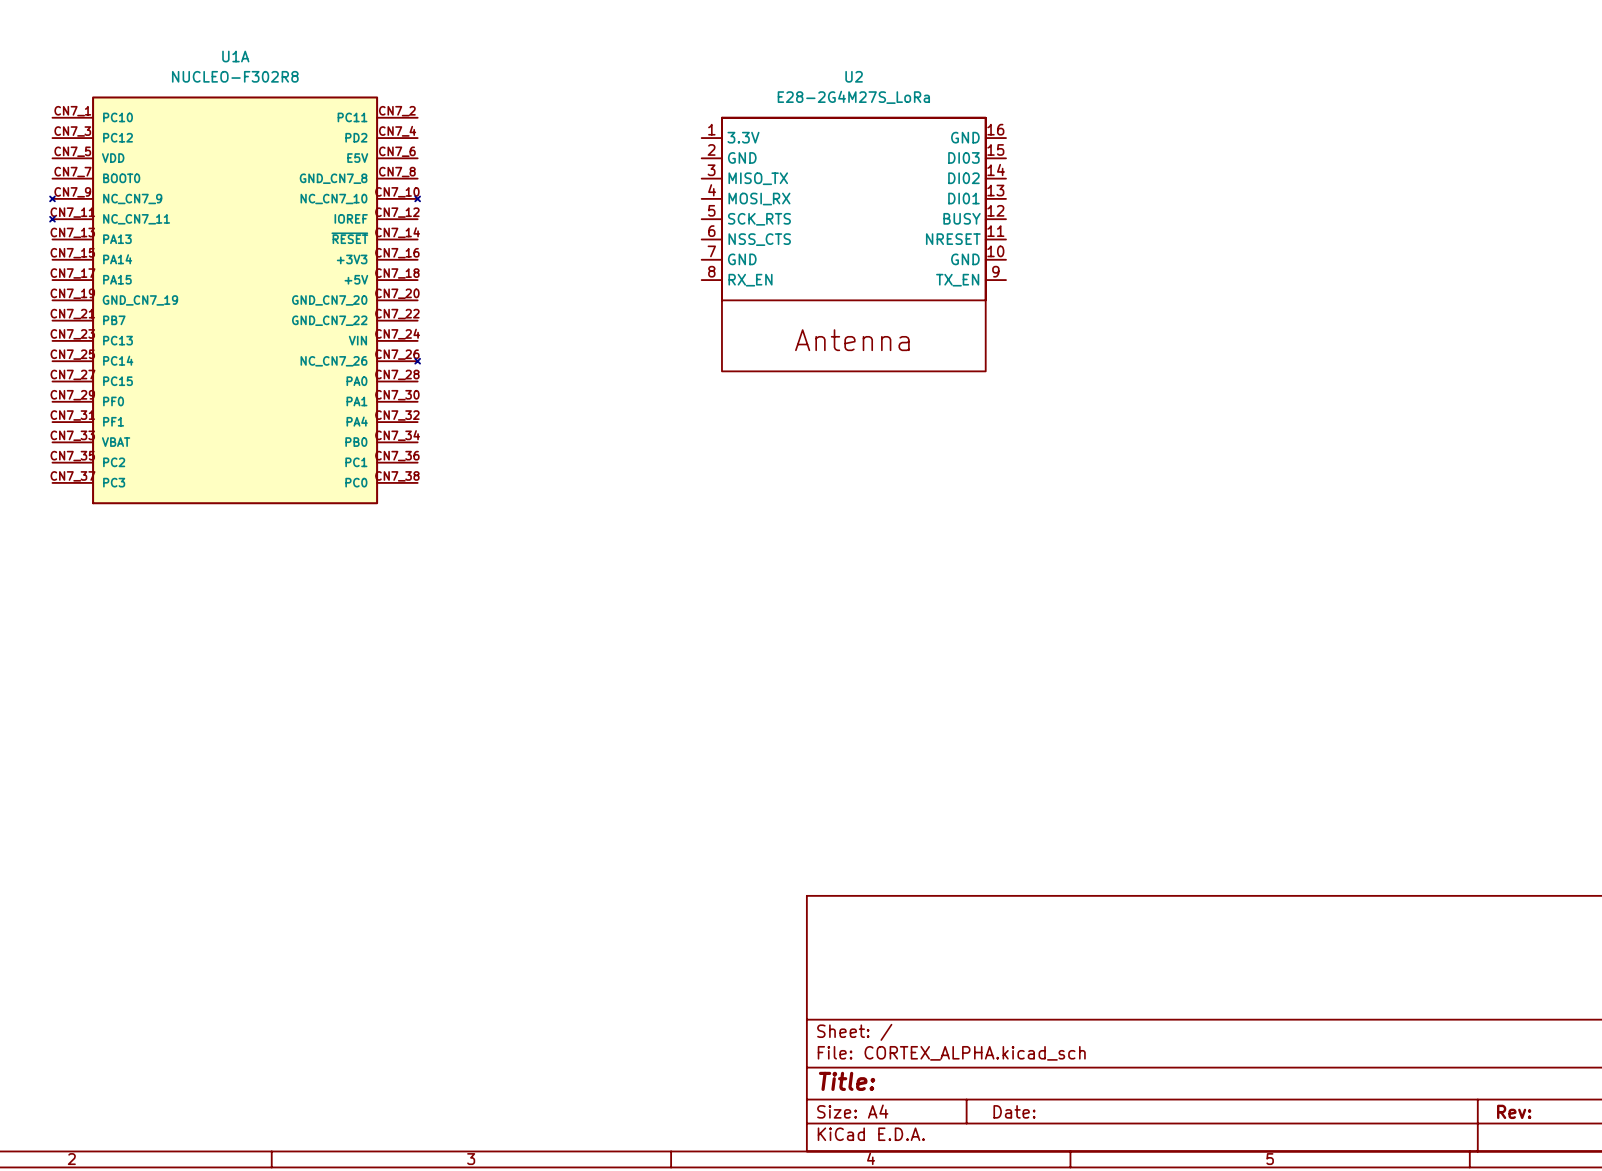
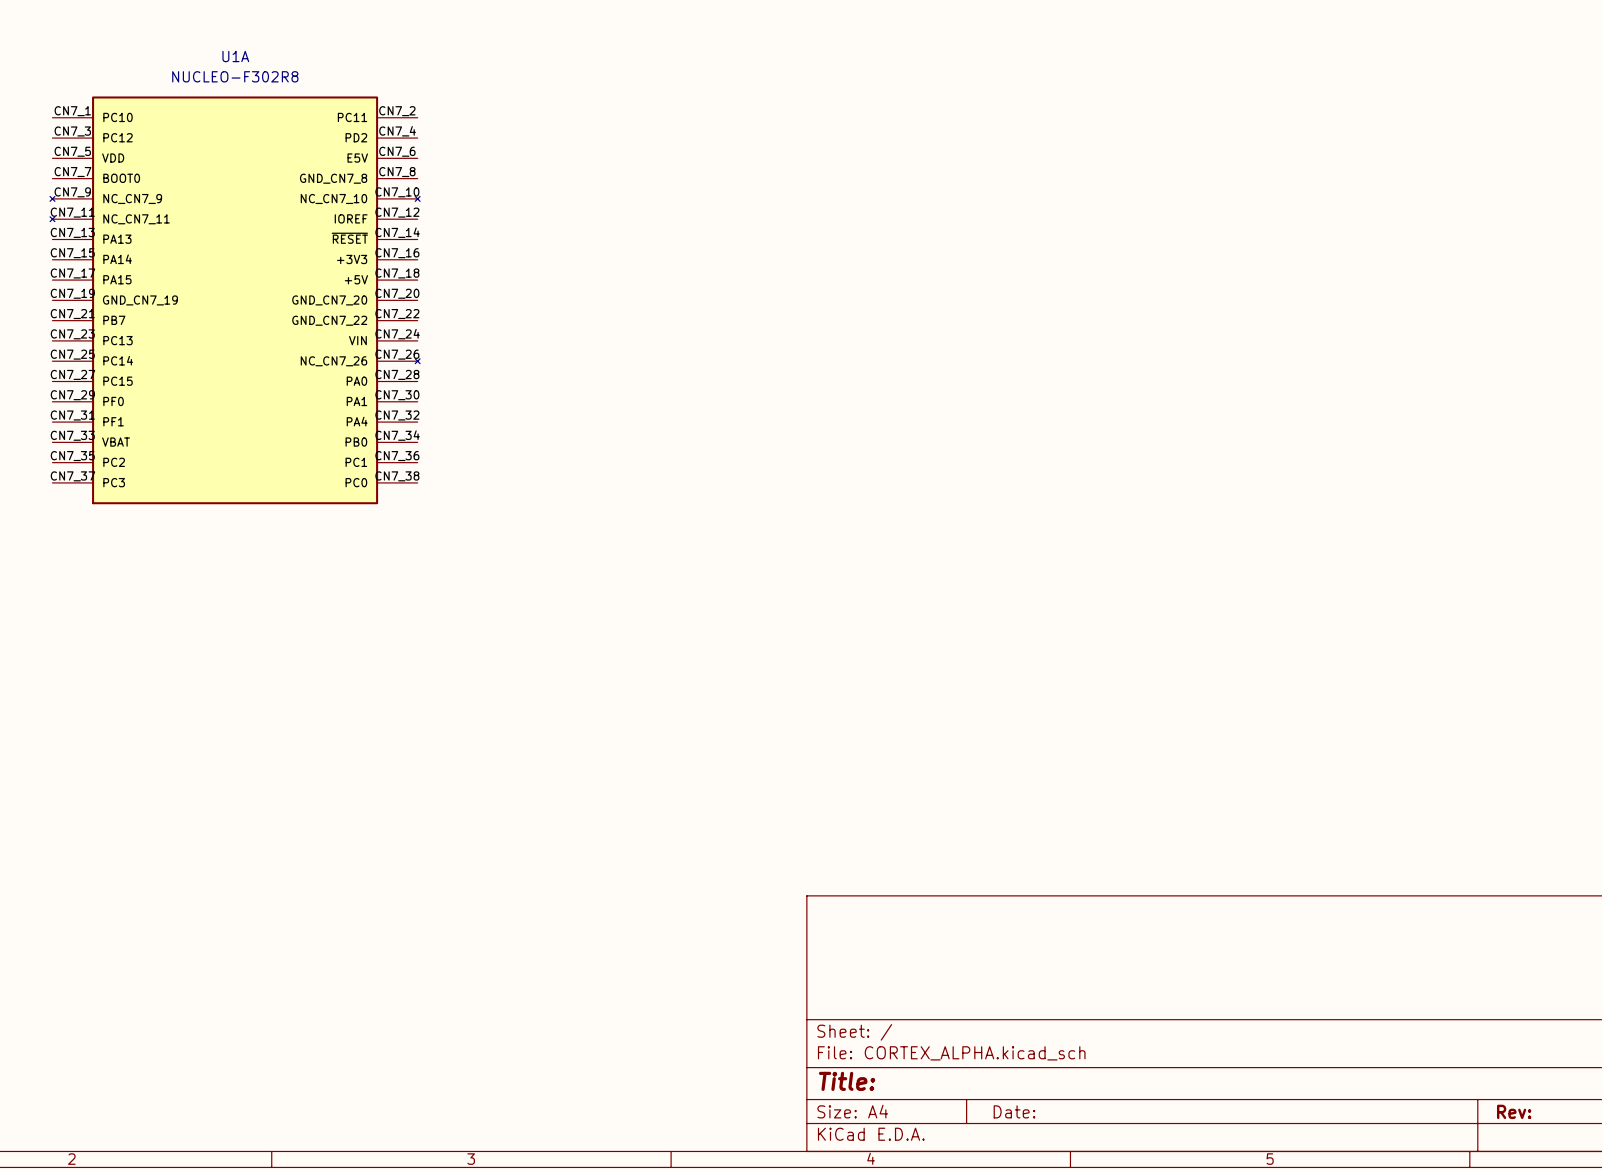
U2: E28-2G4M27S_LoRa (853, 244) -> none

